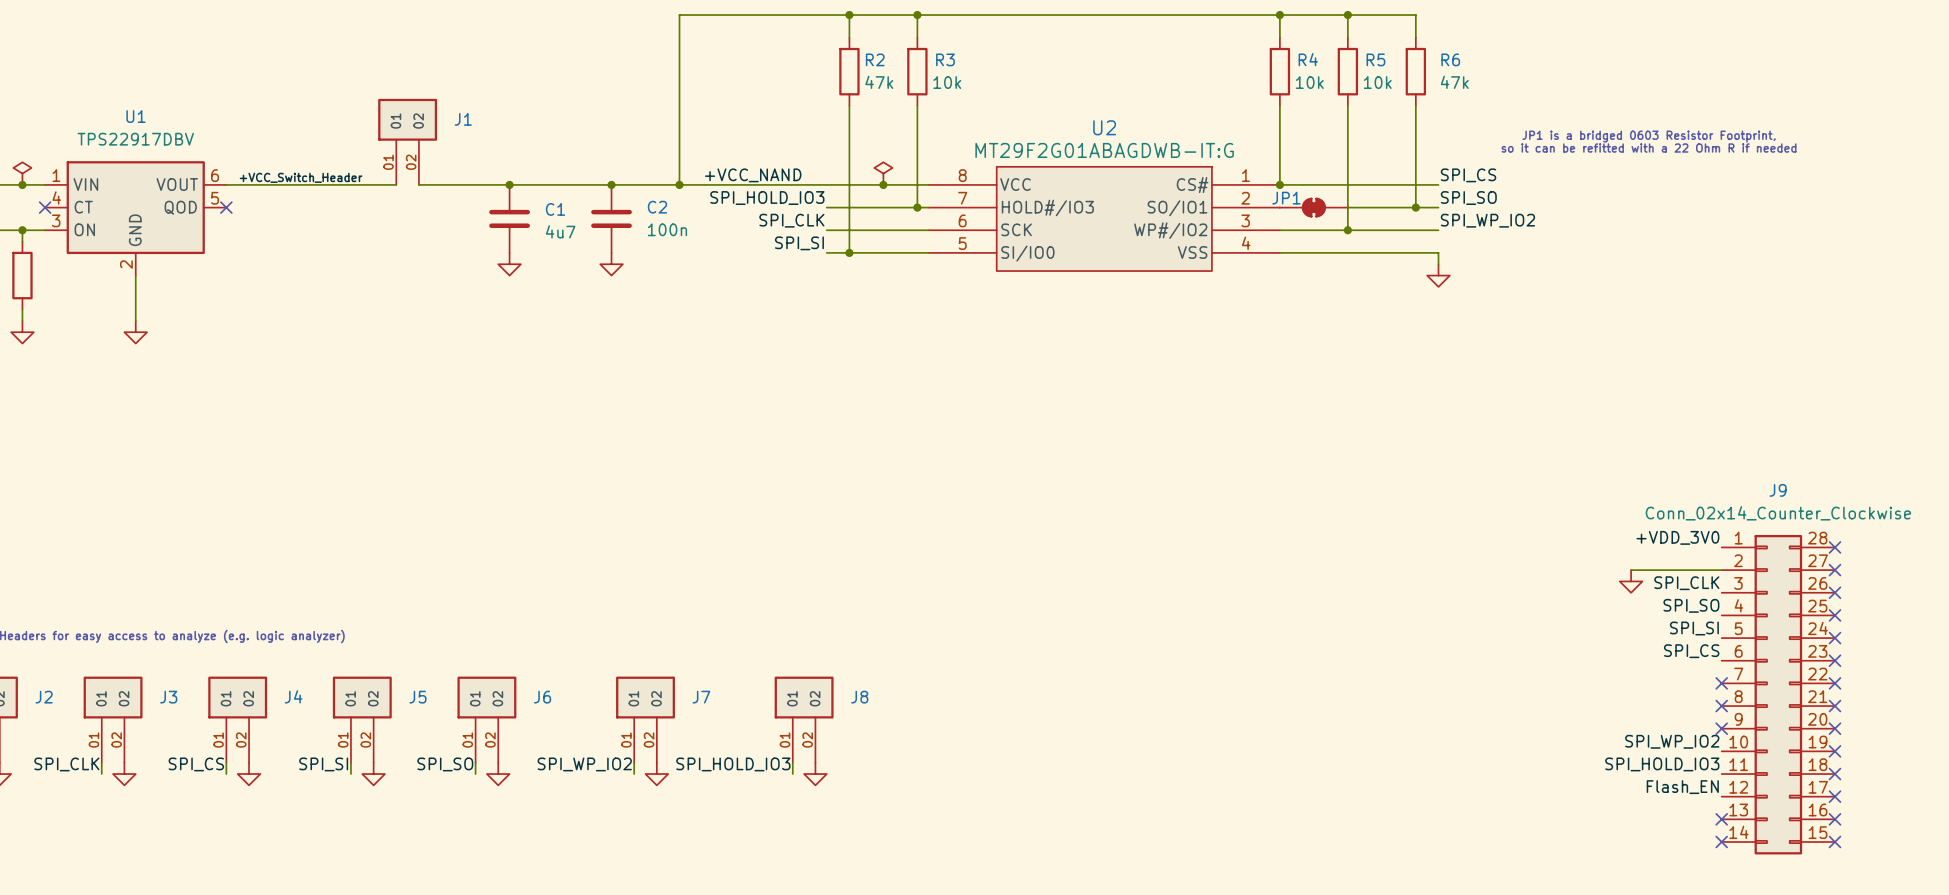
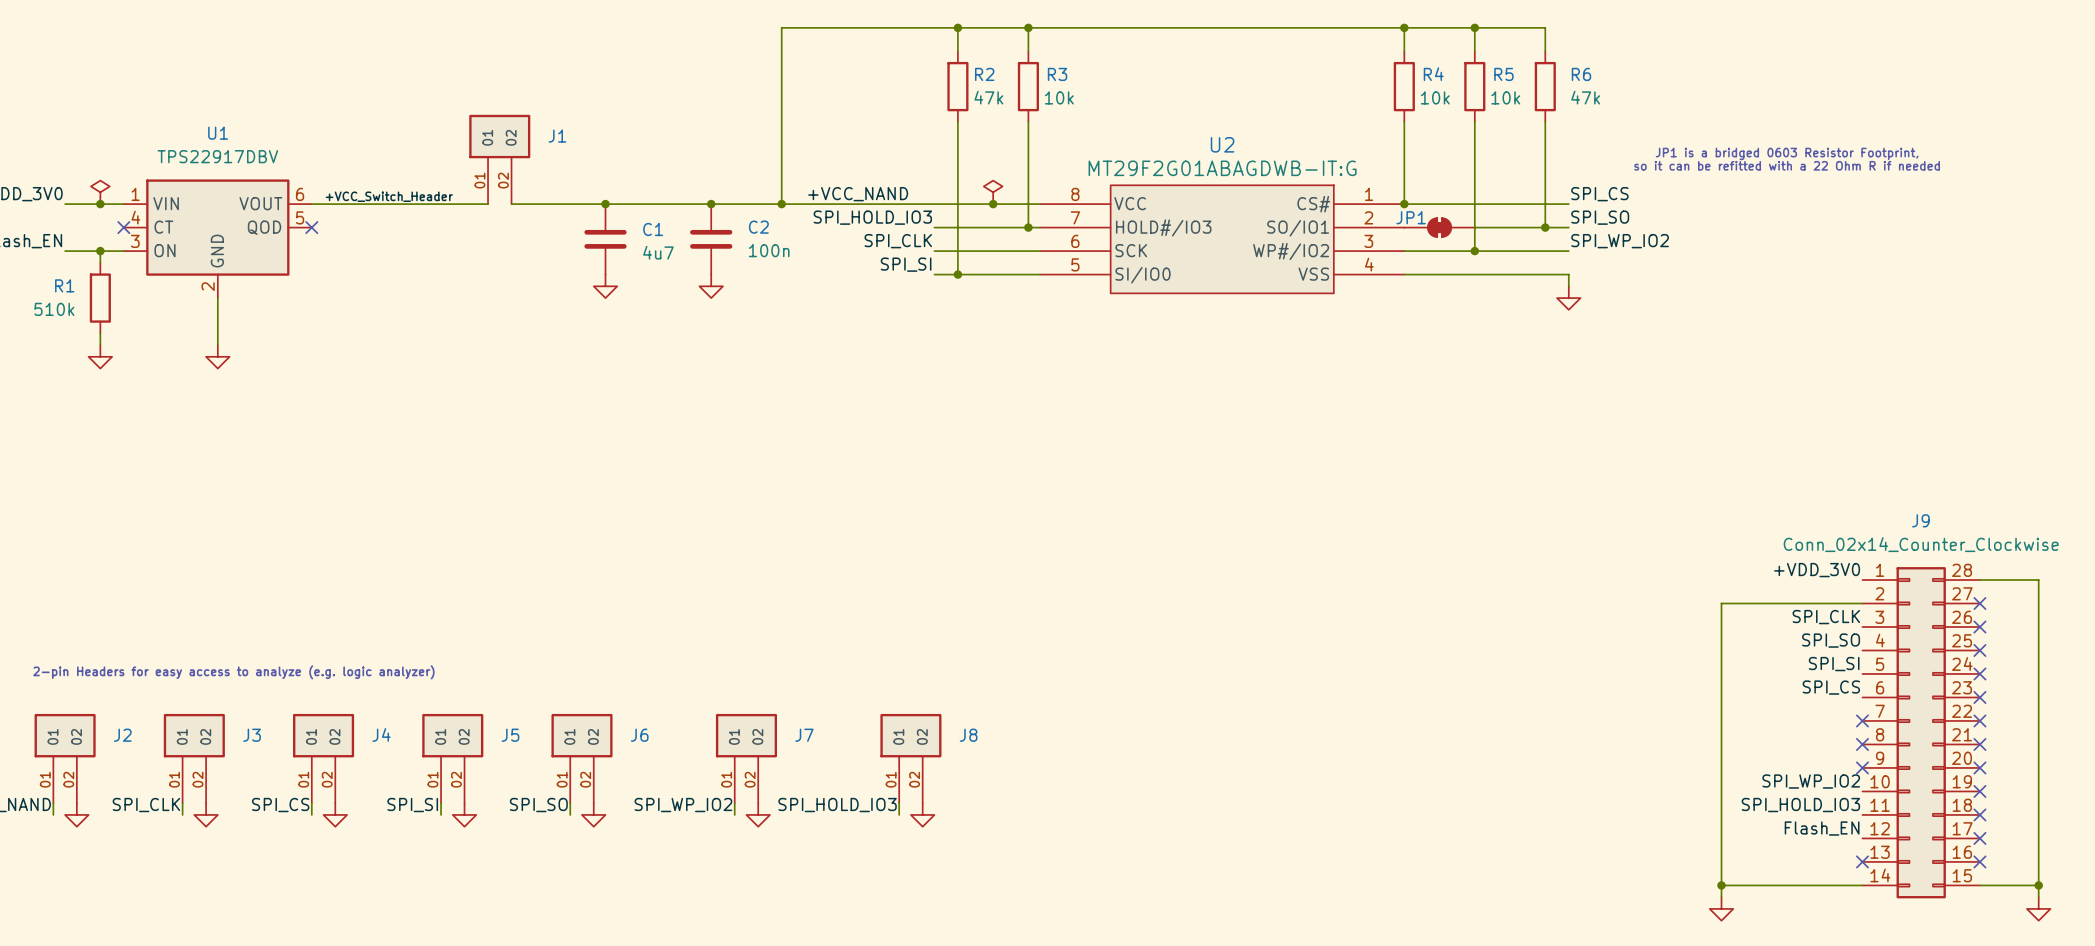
wire: none -> (1979, 580) (2038, 580) (2038, 897)
no-connect mark: (1834, 547) -> none
wire: none -> (1768, 603) (1721, 603) (1721, 897)
power symbol: (1631, 581) -> none
wire: none -> (1721, 885) (1862, 885)
junction: none -> (1721, 885)
no-connect mark: (1721, 841) -> none
wire: none -> (1979, 885) (2038, 885)
no-connect mark: (1834, 841) -> none
junction: none -> (2038, 885)
power symbol: none -> (1721, 908)
power symbol: none -> (2038, 908)

